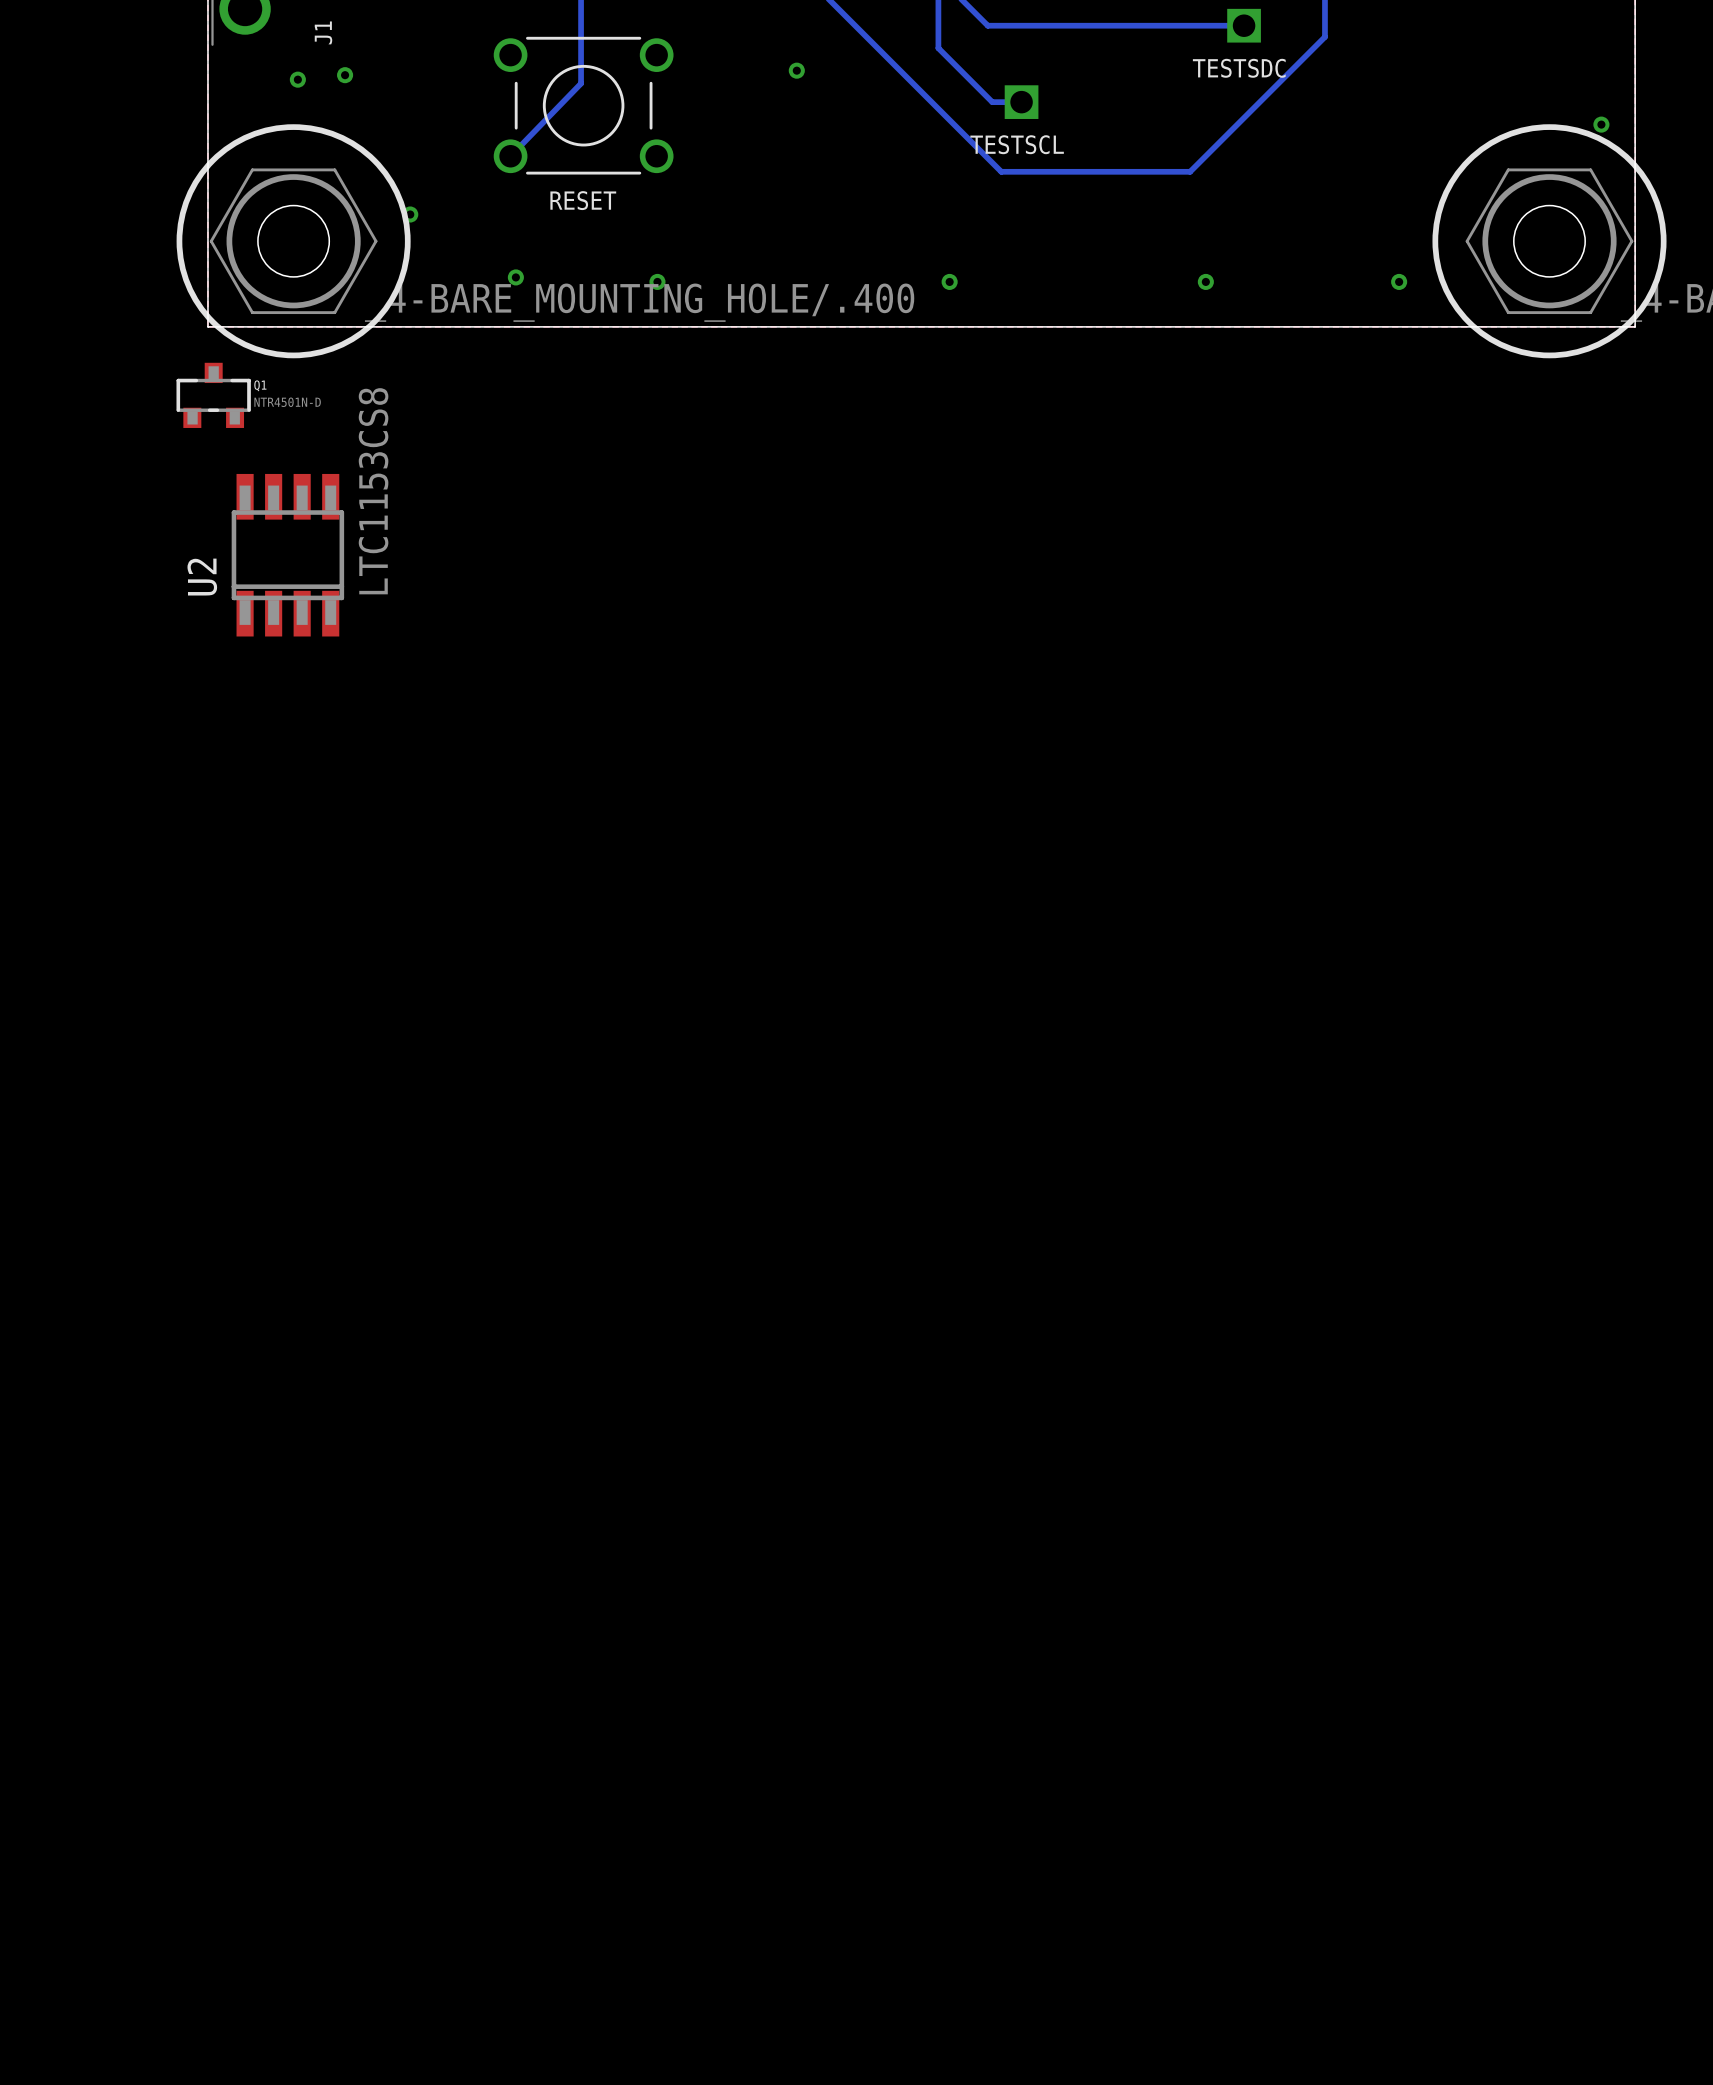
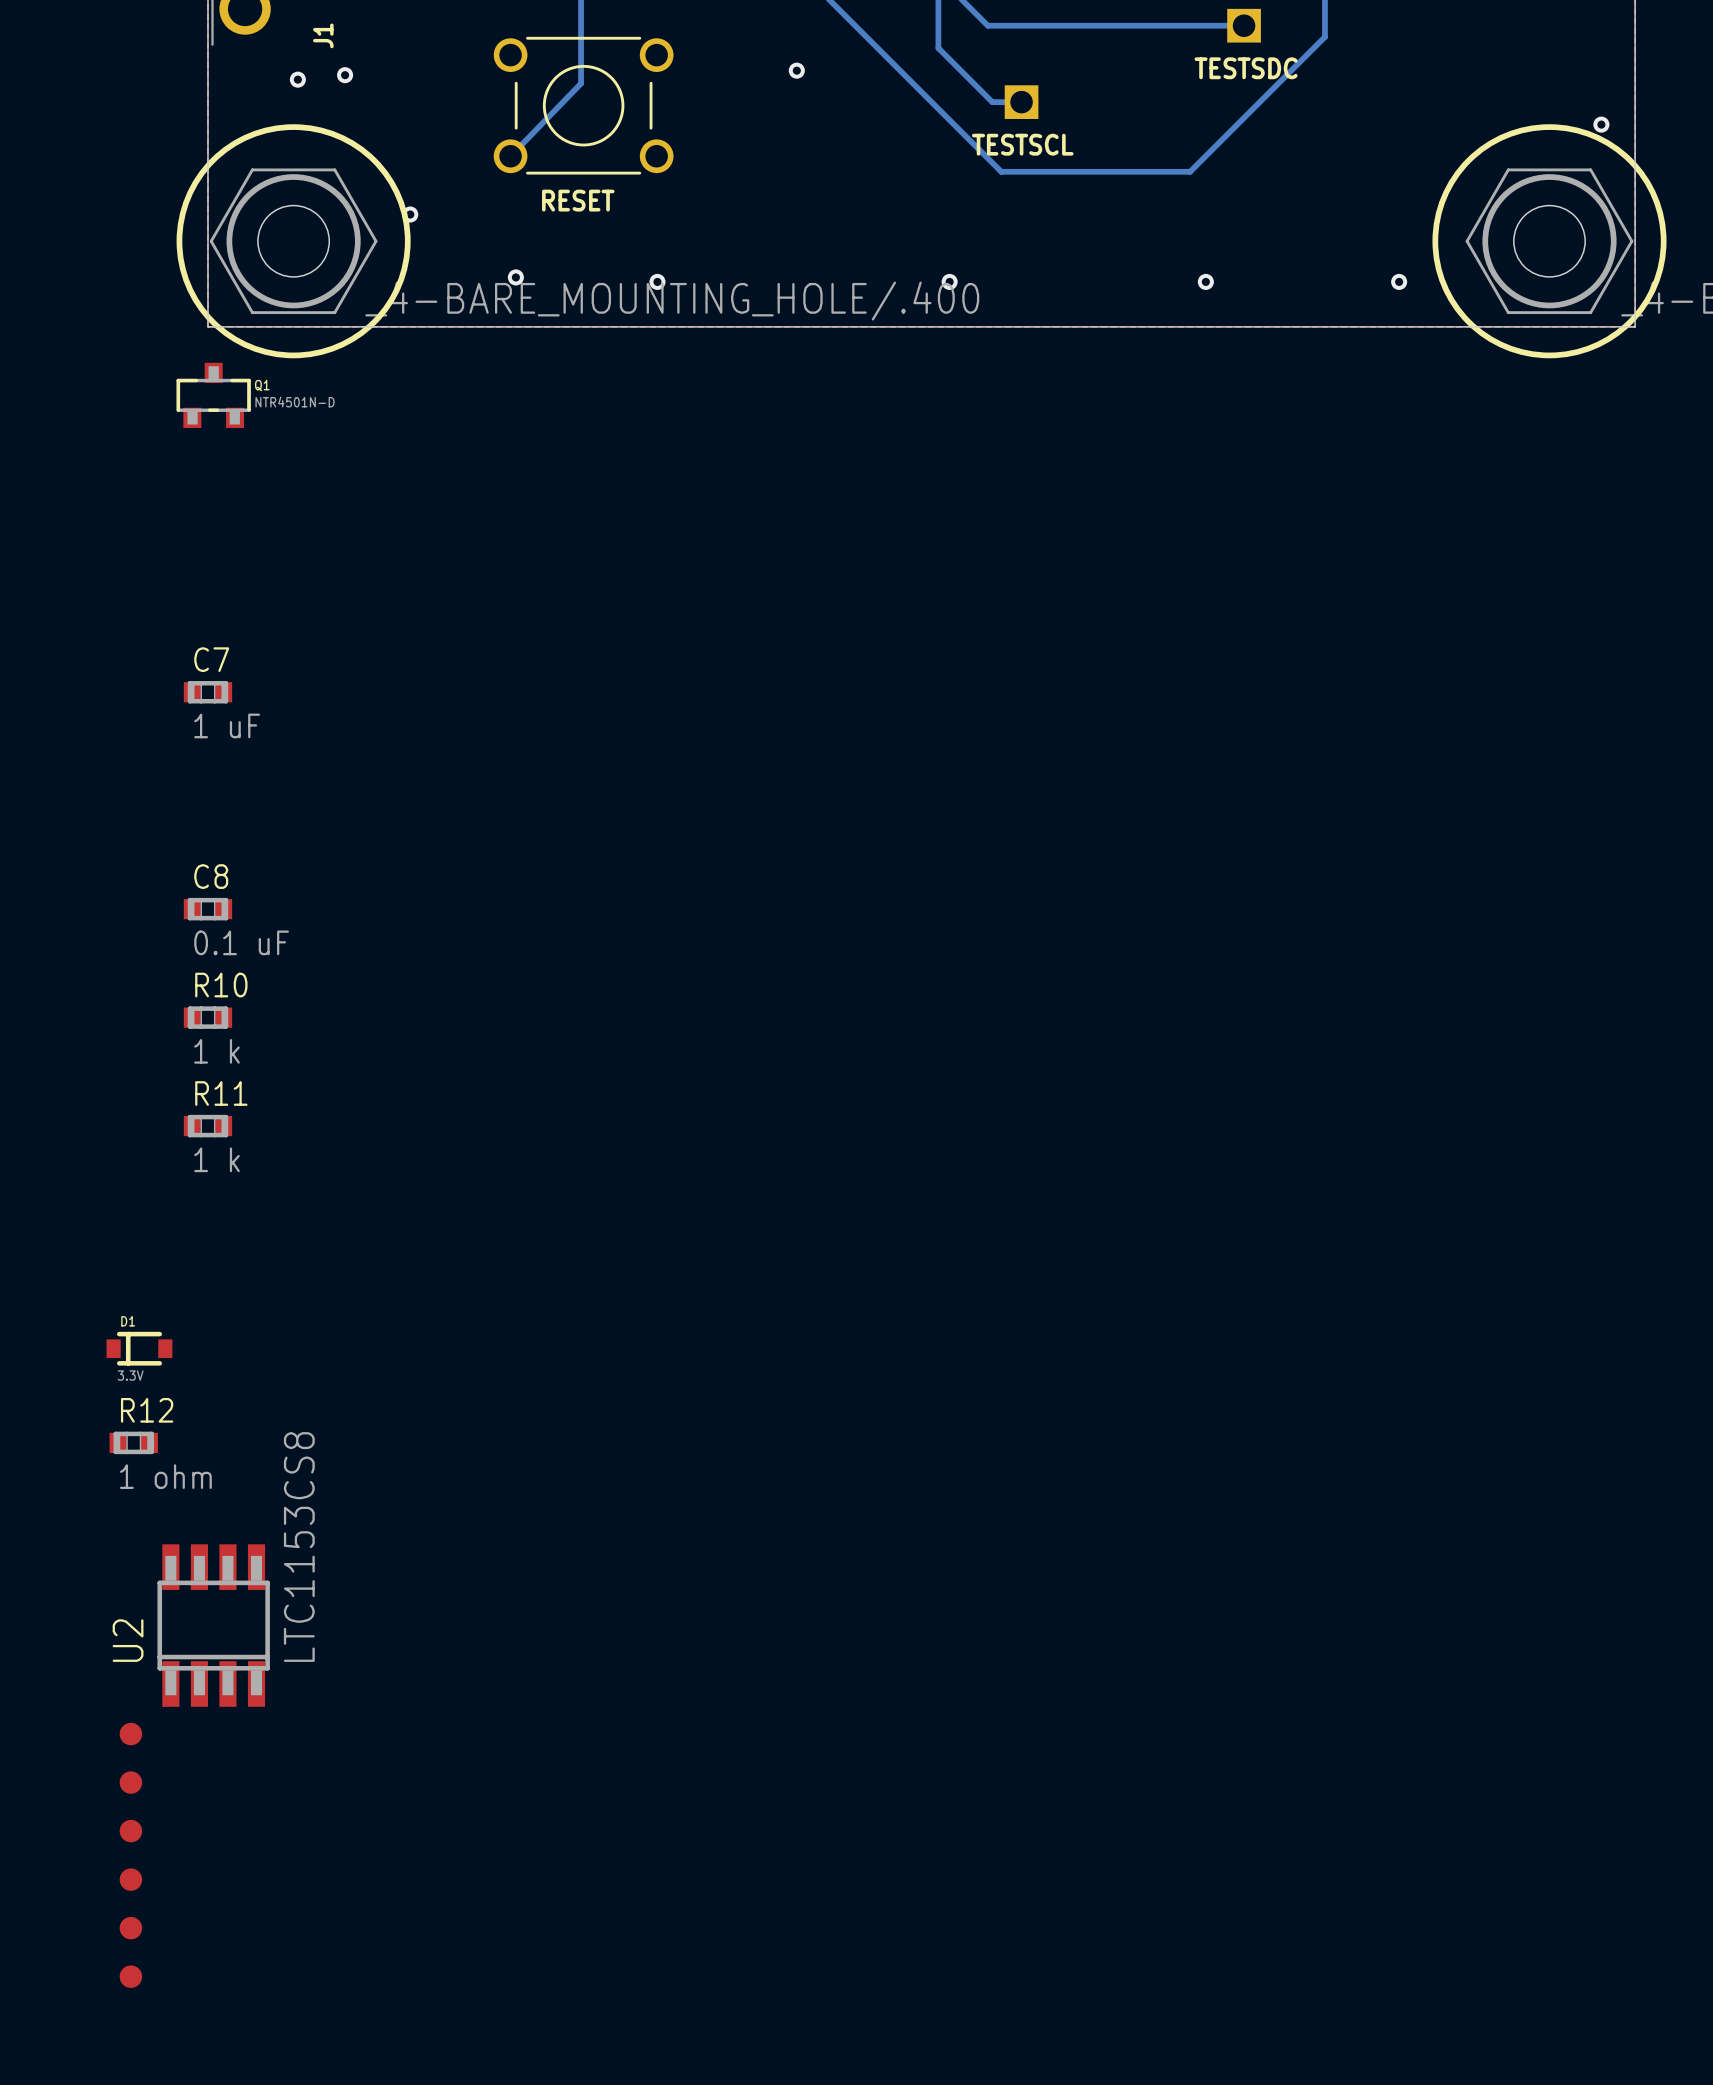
U2 position: (287, 555) -> (213, 1625)
C7: none -> 1 uF (207, 692)
C8: none -> 0.1 uF (207, 909)
R10: none -> 1 k (207, 1017)
R11: none -> 1 k (207, 1126)
D1: none -> 3.3V (139, 1348)
R12: none -> 1 ohm (133, 1442)
part: none -> (130, 1734)
part: none -> (130, 1782)
part: none -> (130, 1831)
part: none -> (130, 1879)
part: none -> (130, 1928)
part: none -> (130, 1976)

